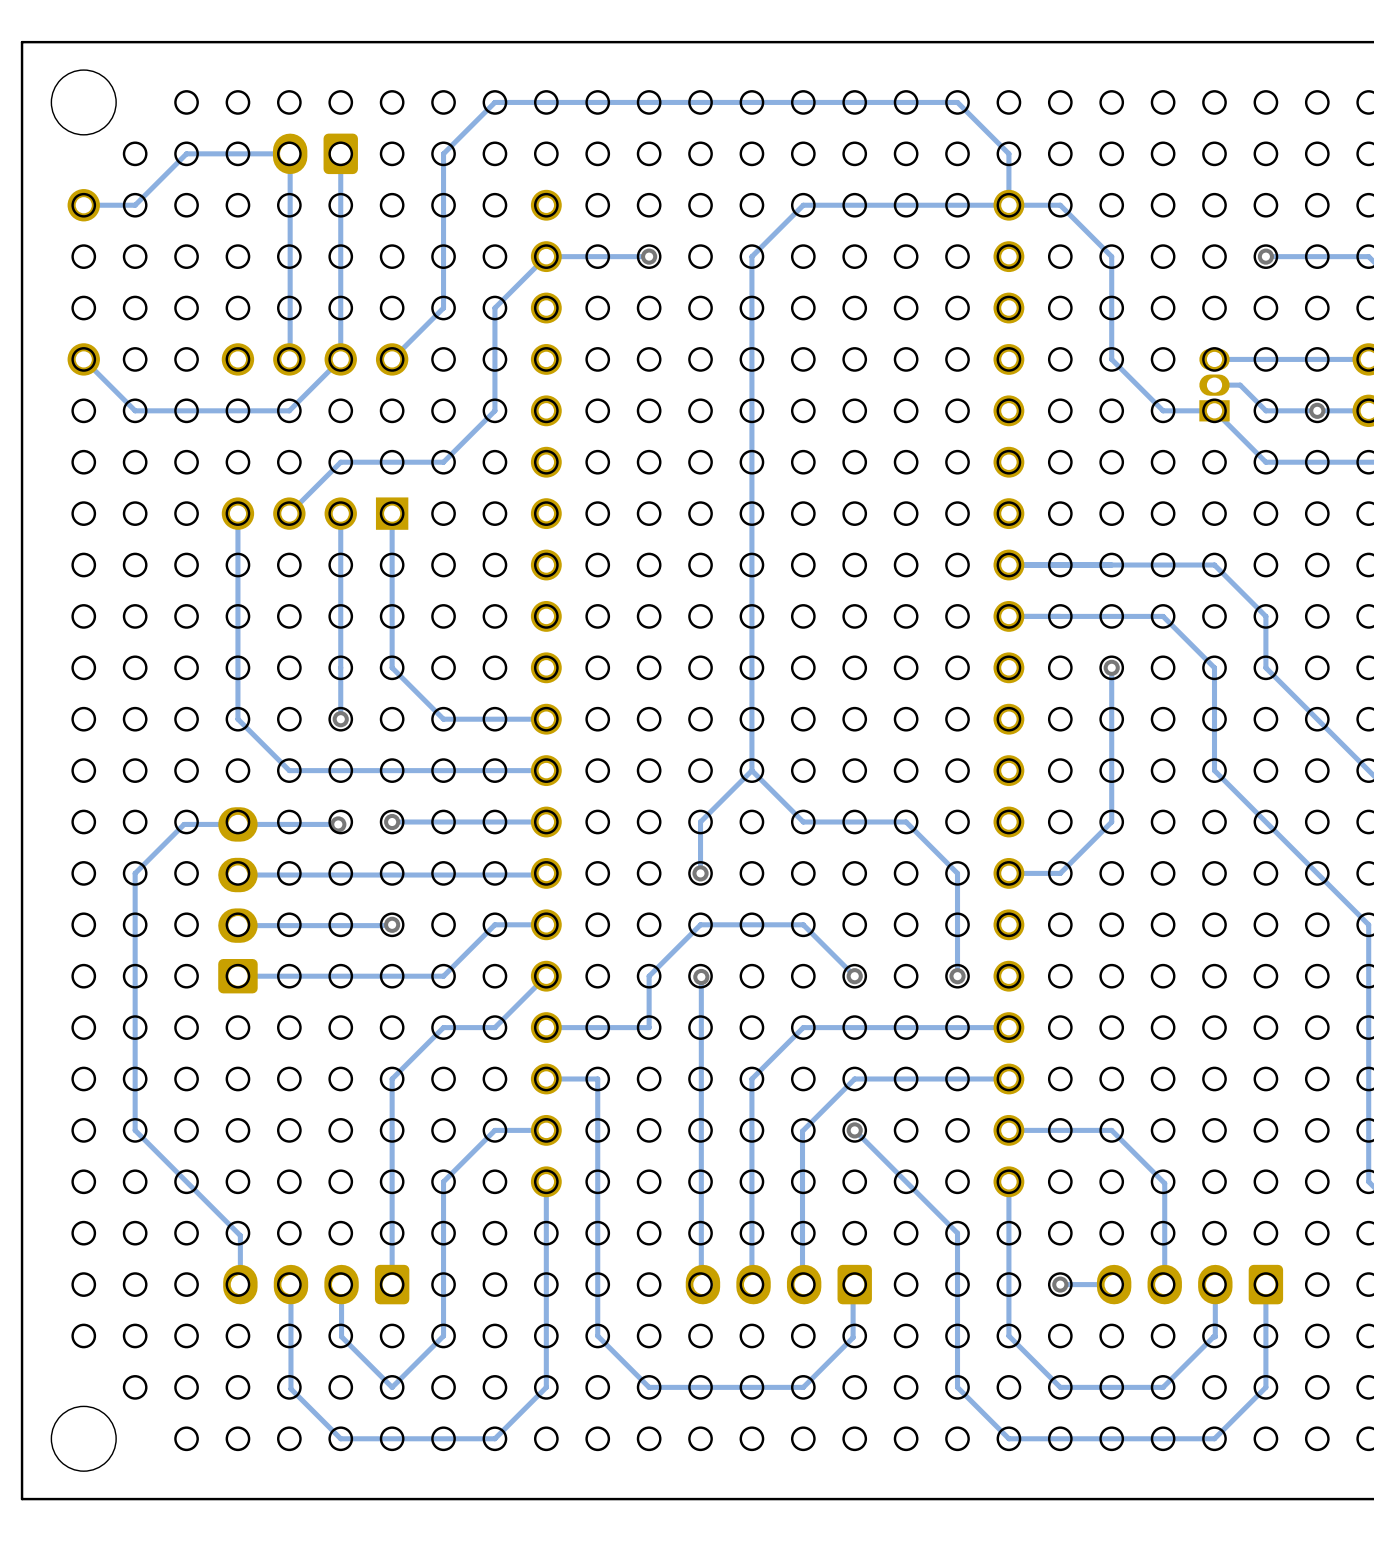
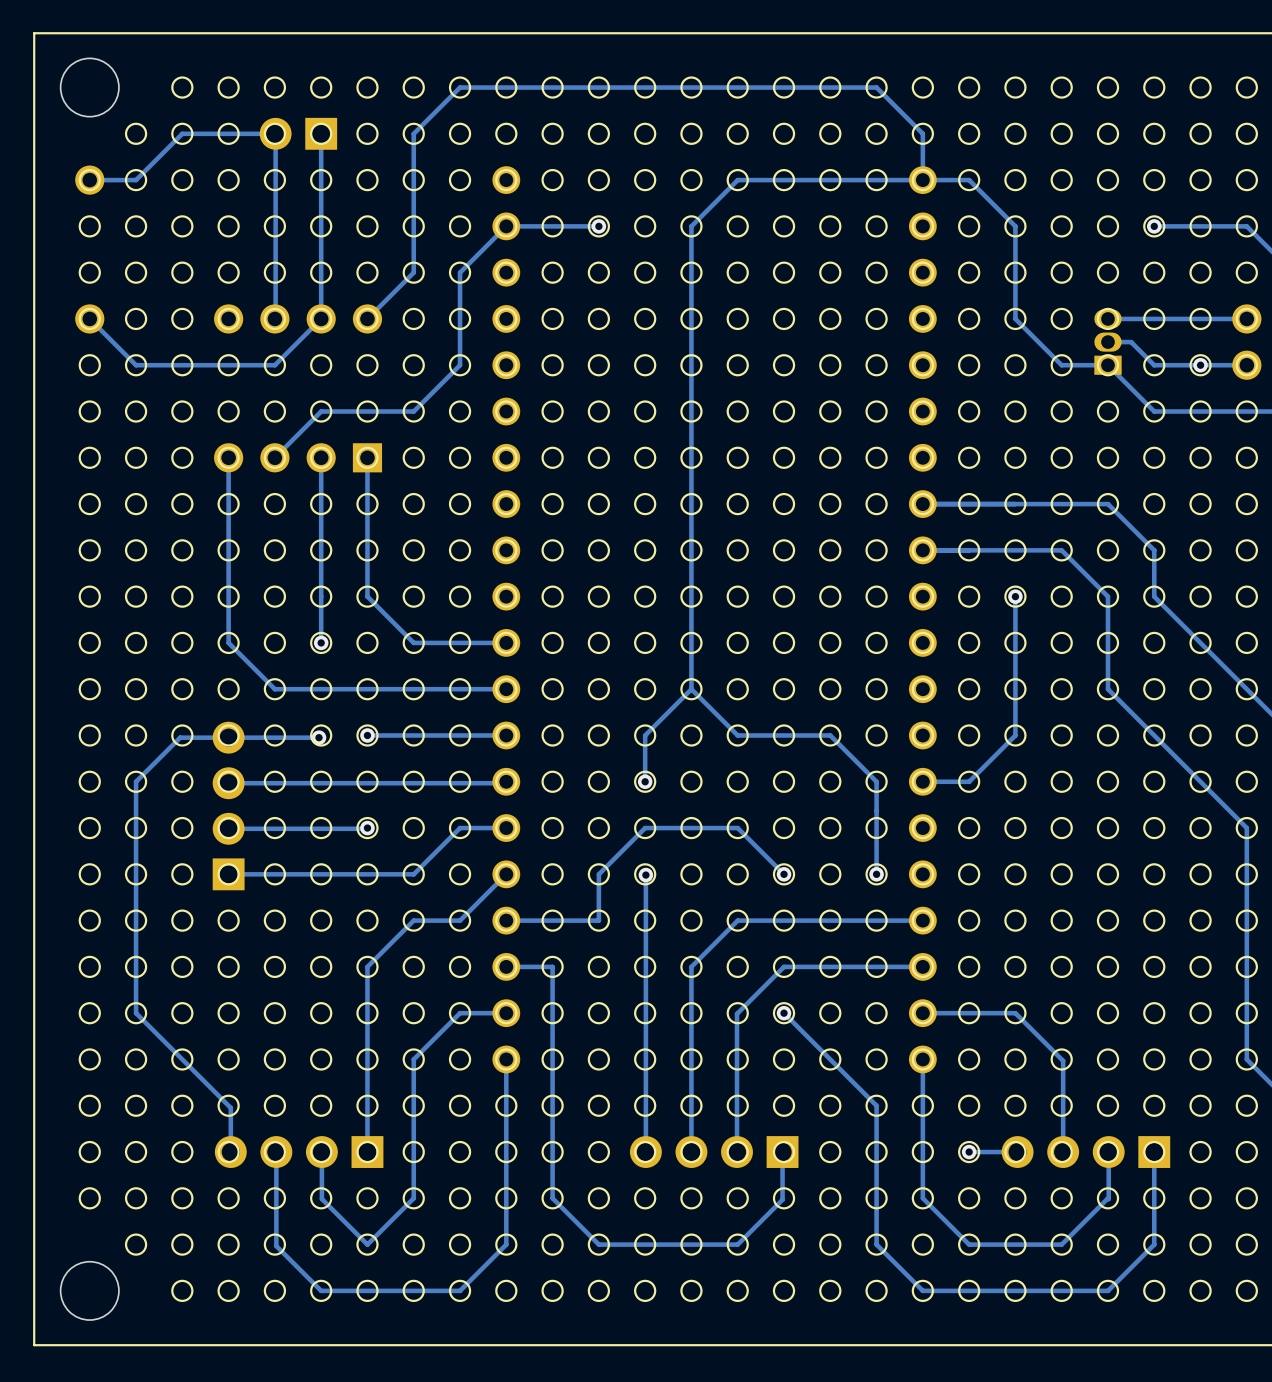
part footprint: [272, 133, 358, 175] -> [259, 117, 338, 150]
part footprint: [218, 807, 258, 994] -> [212, 721, 245, 891]
part footprint: [223, 1264, 410, 1305] -> [214, 1136, 384, 1168]
part footprint: [685, 1264, 872, 1305] -> [629, 1136, 799, 1168]
part footprint: [1096, 1264, 1284, 1305] -> [1001, 1136, 1171, 1168]

